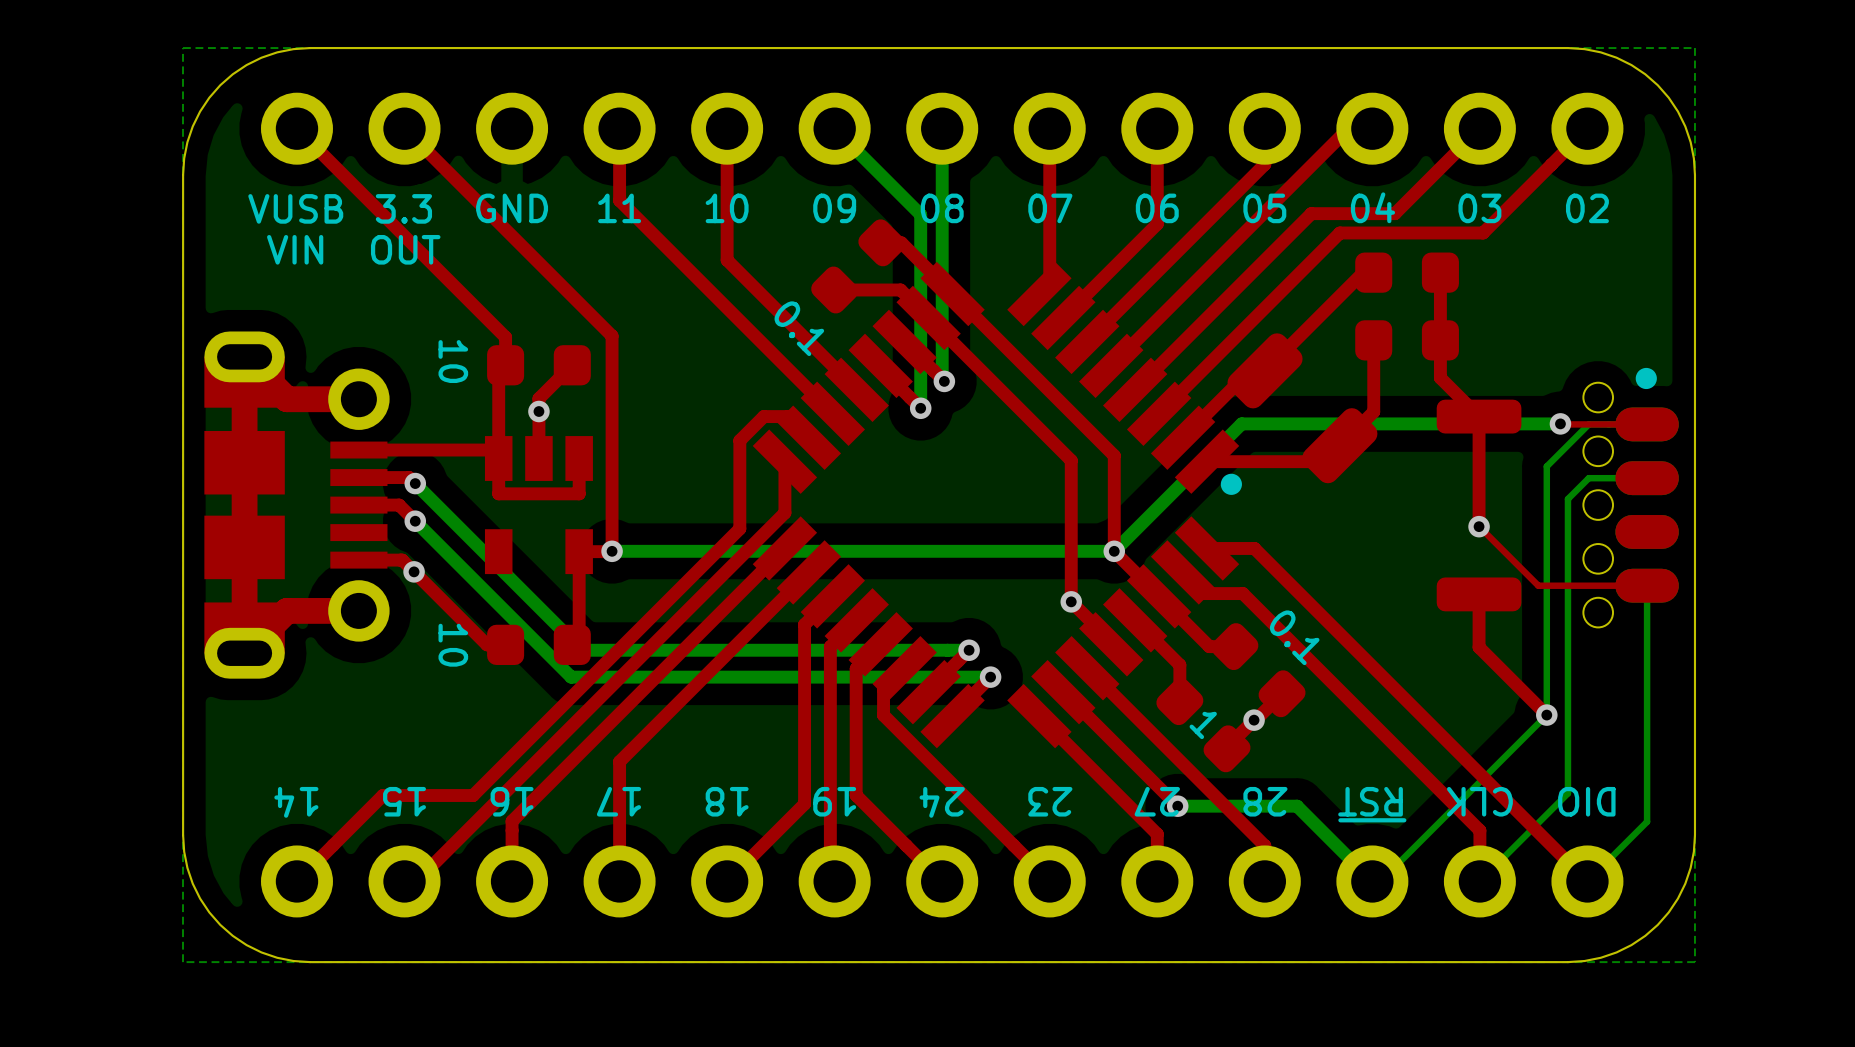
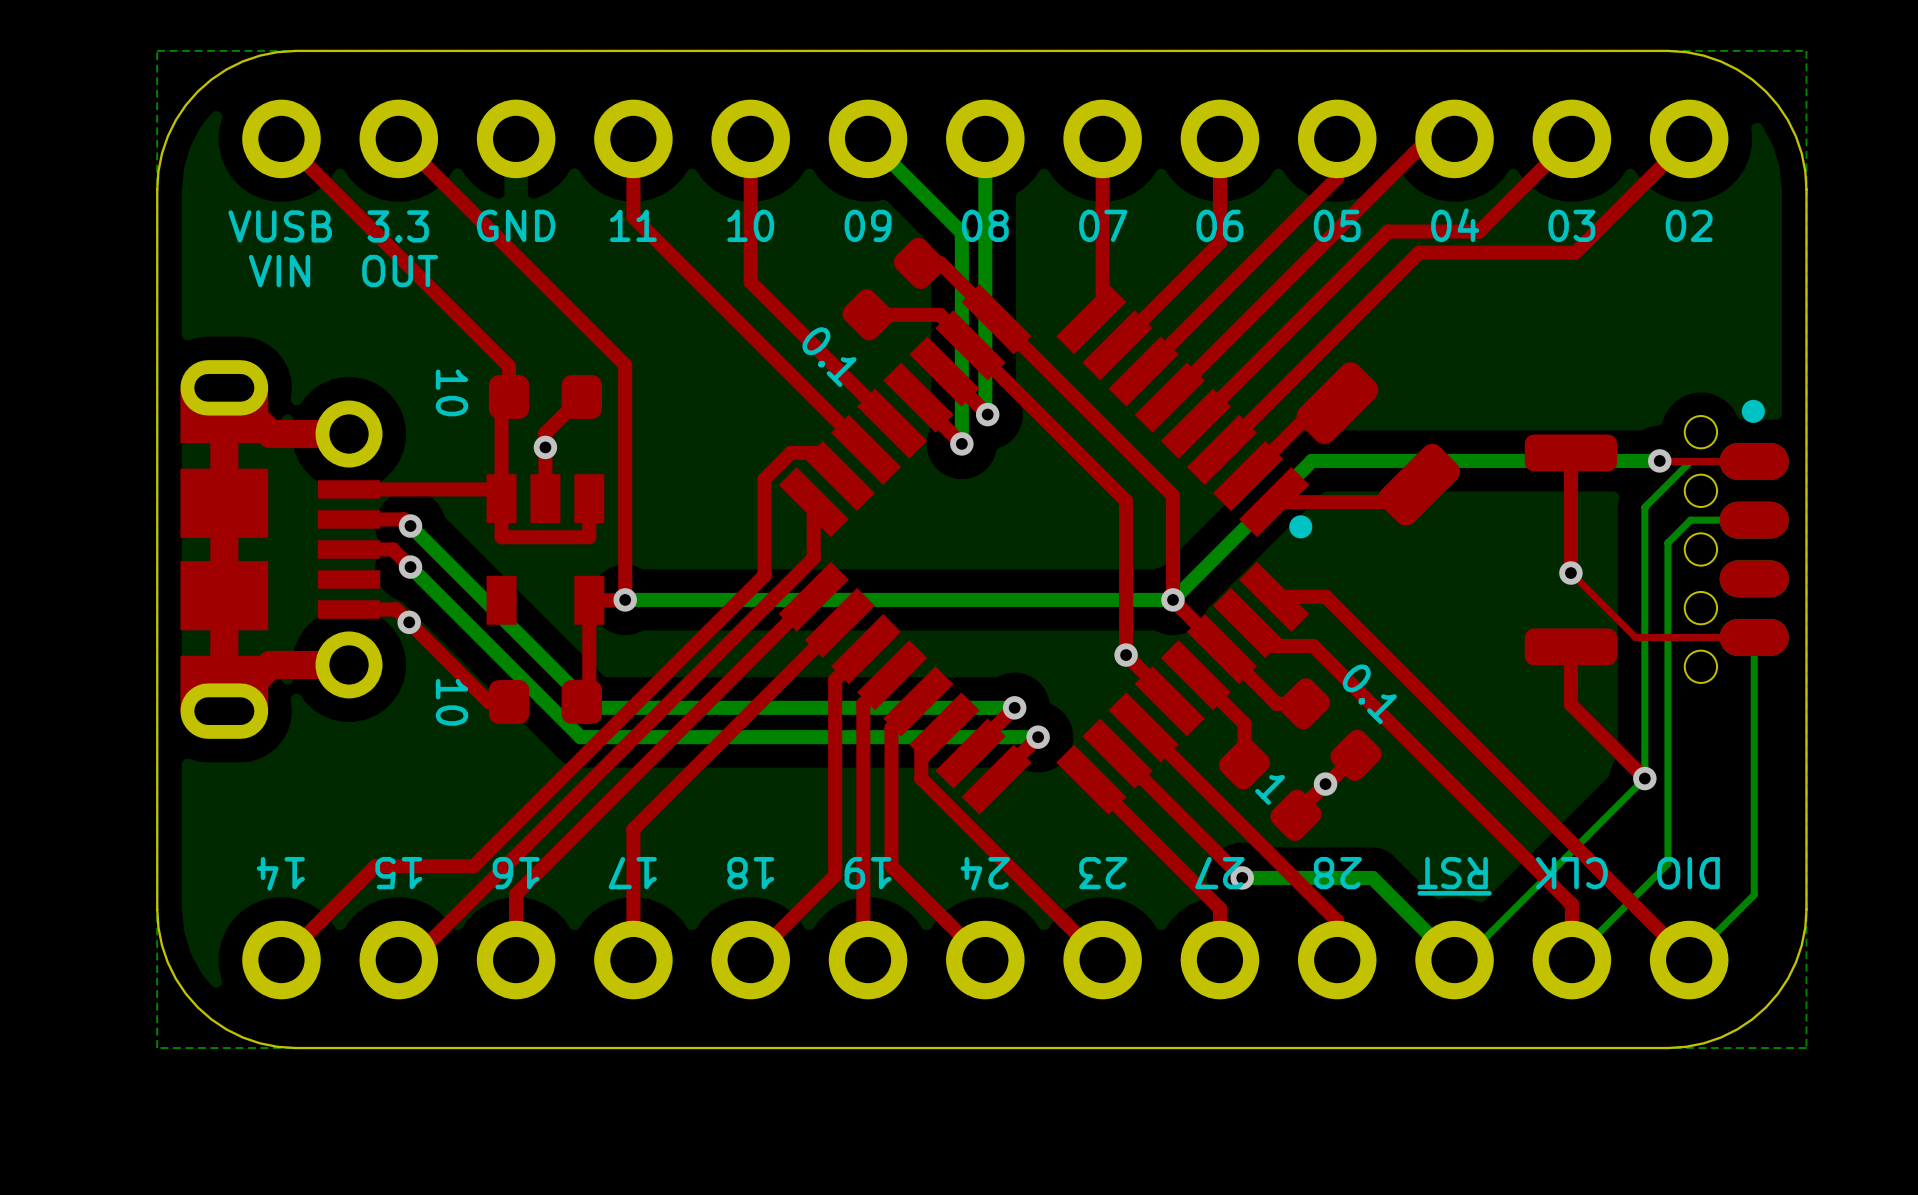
top track: (1373, 272) (1363, 272) (1265, 370) -> none
part: (1407, 272) -> none
top track: (1440, 272) (1440, 377) (1479, 416) -> none
top track: (1373, 340) (1373, 411) (1339, 445) -> none
part: (1407, 340) -> none

